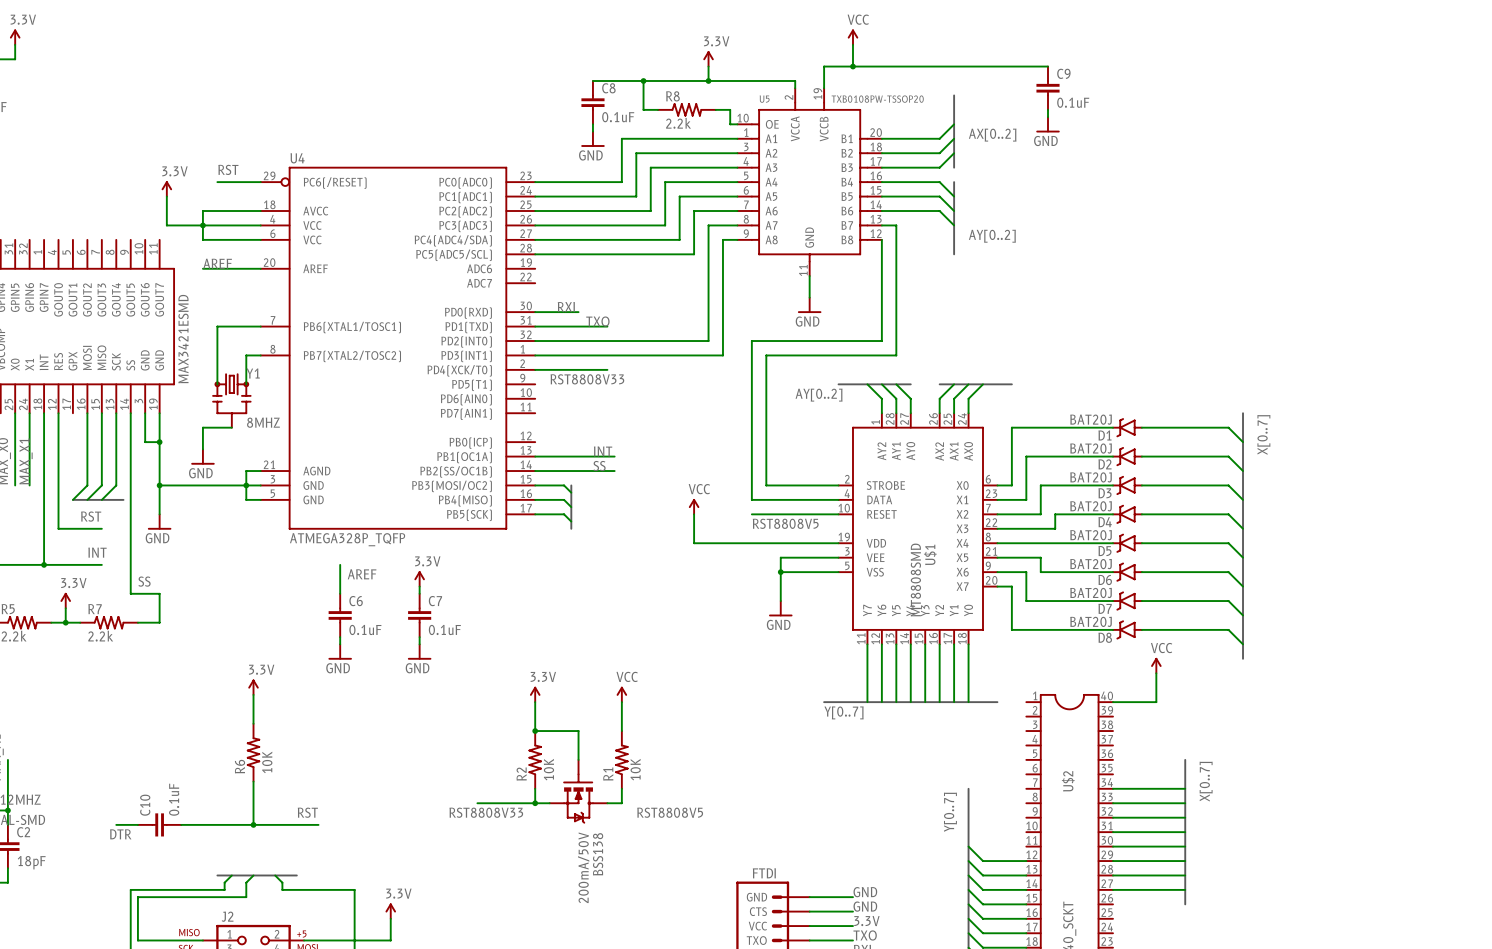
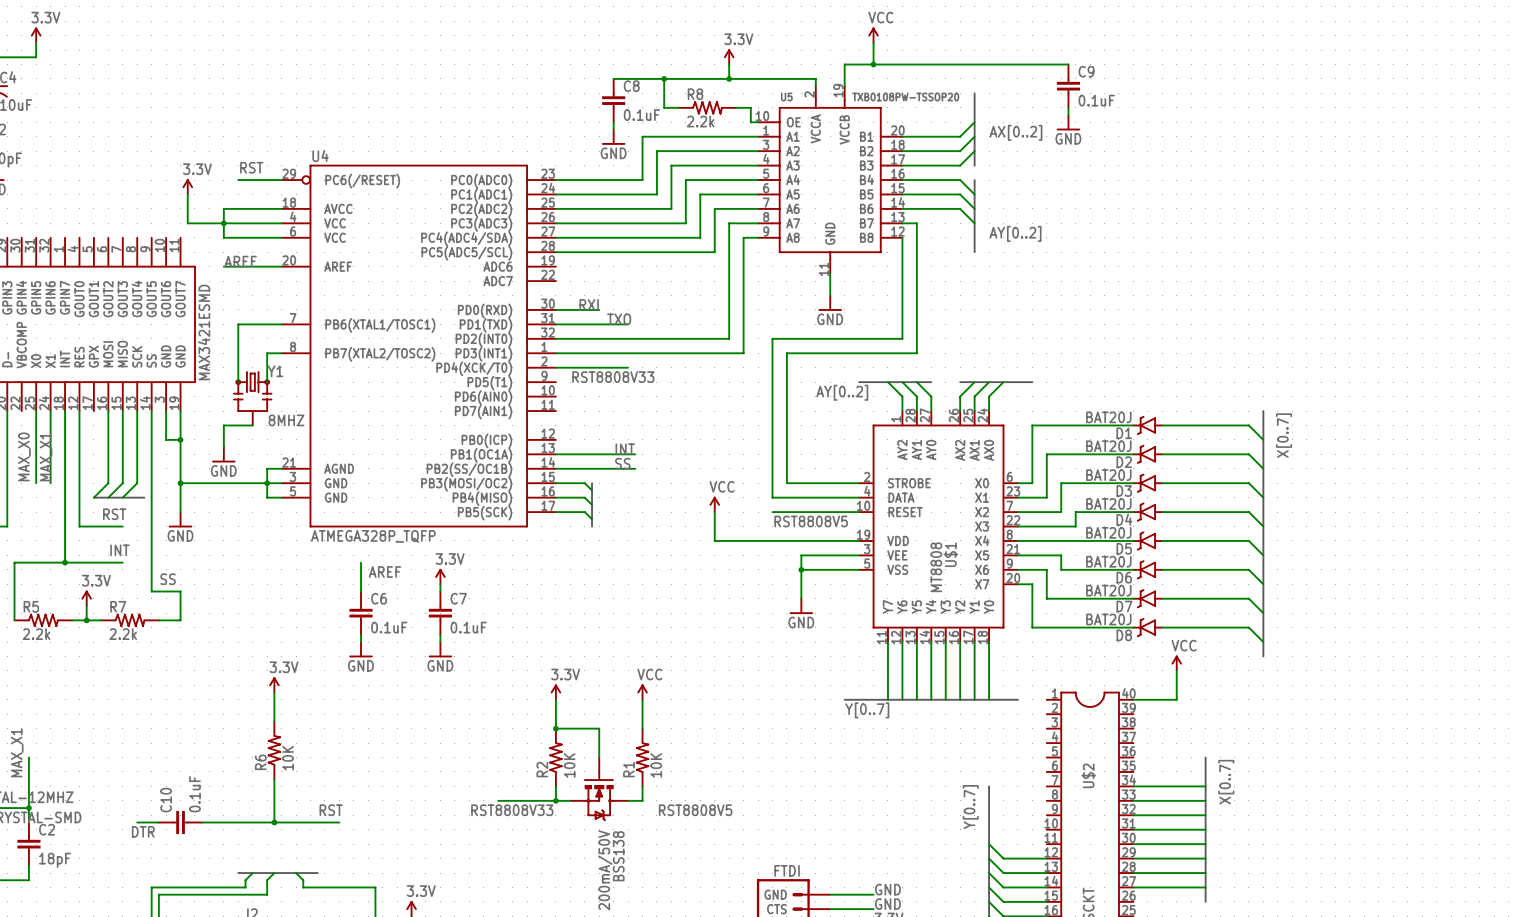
U$1 value: MT8808SMD (915, 580) -> MT8808 (936, 567)

